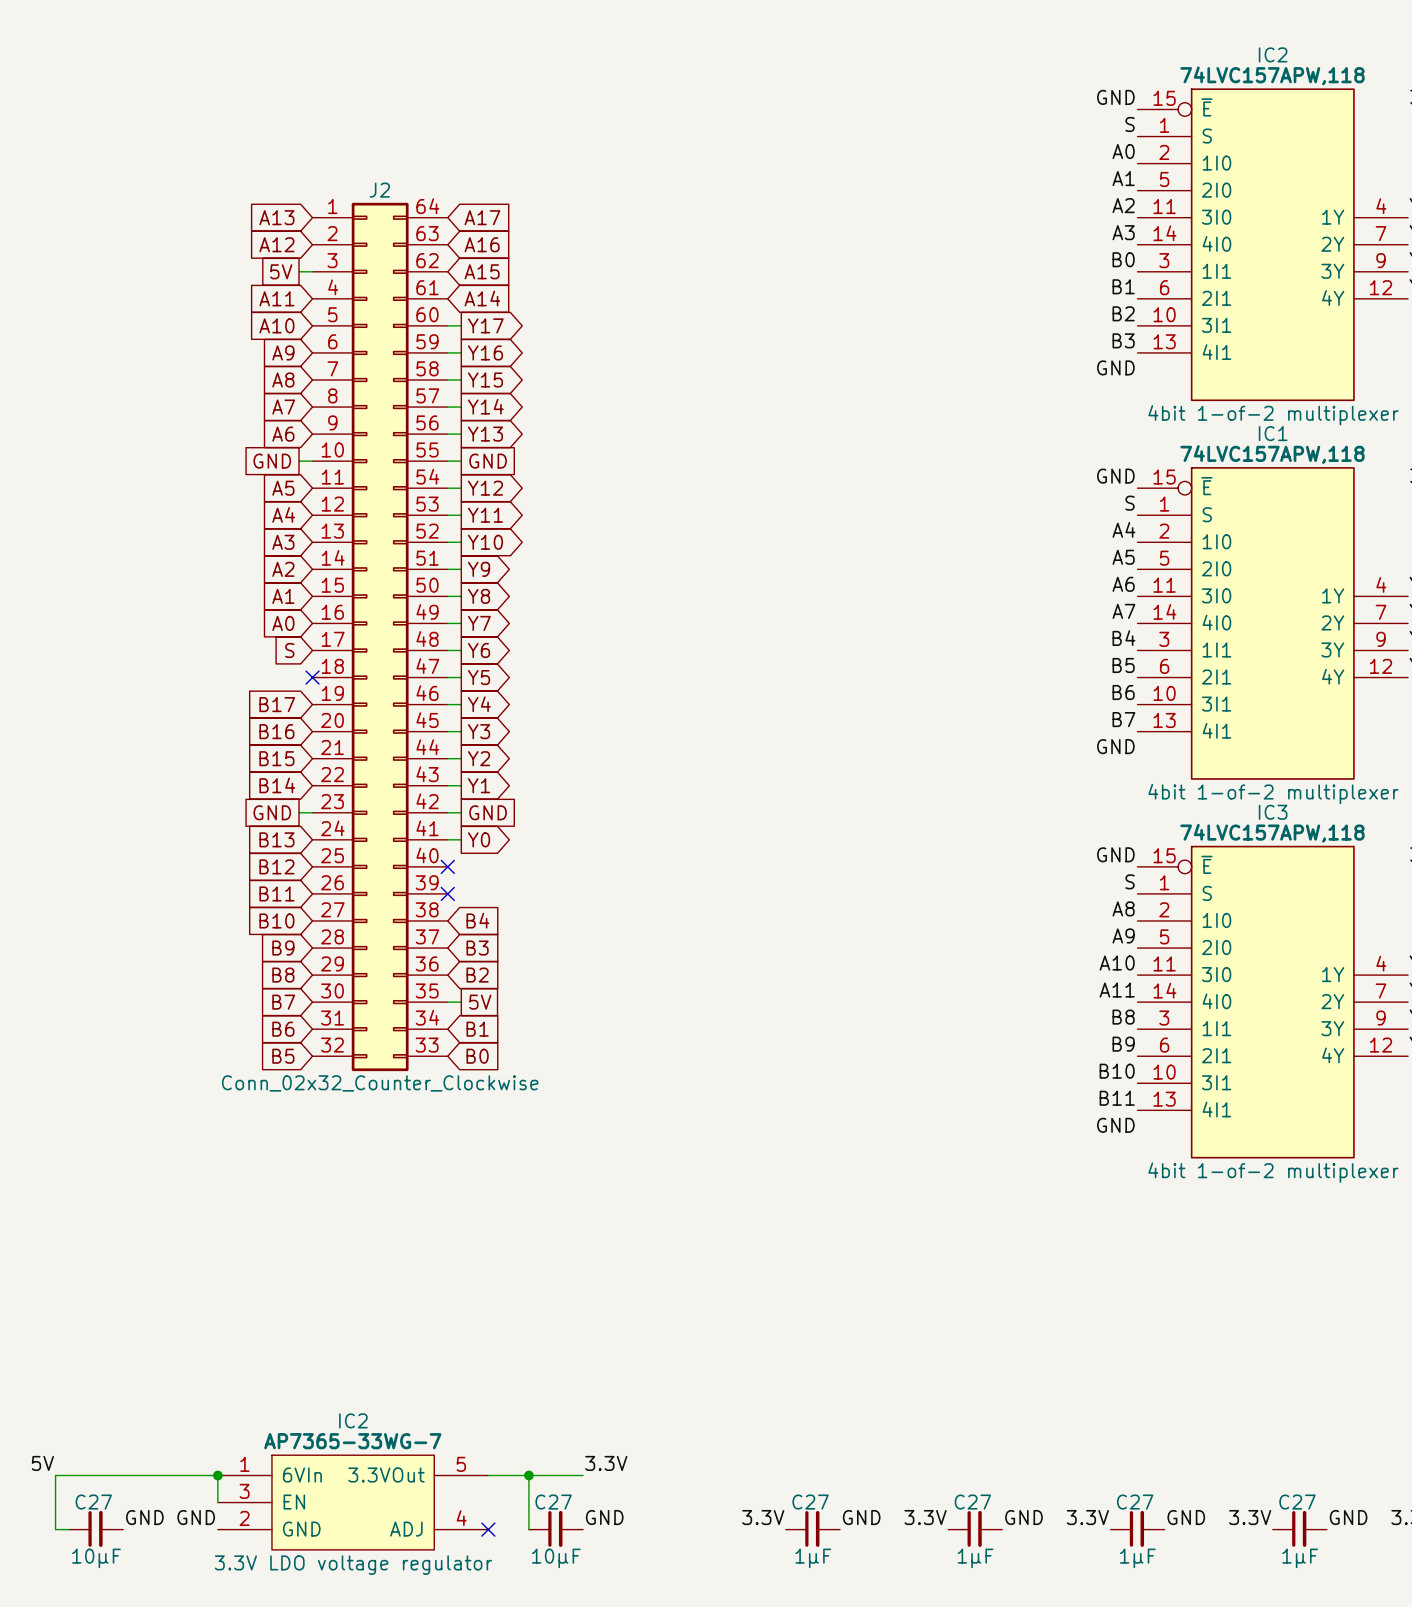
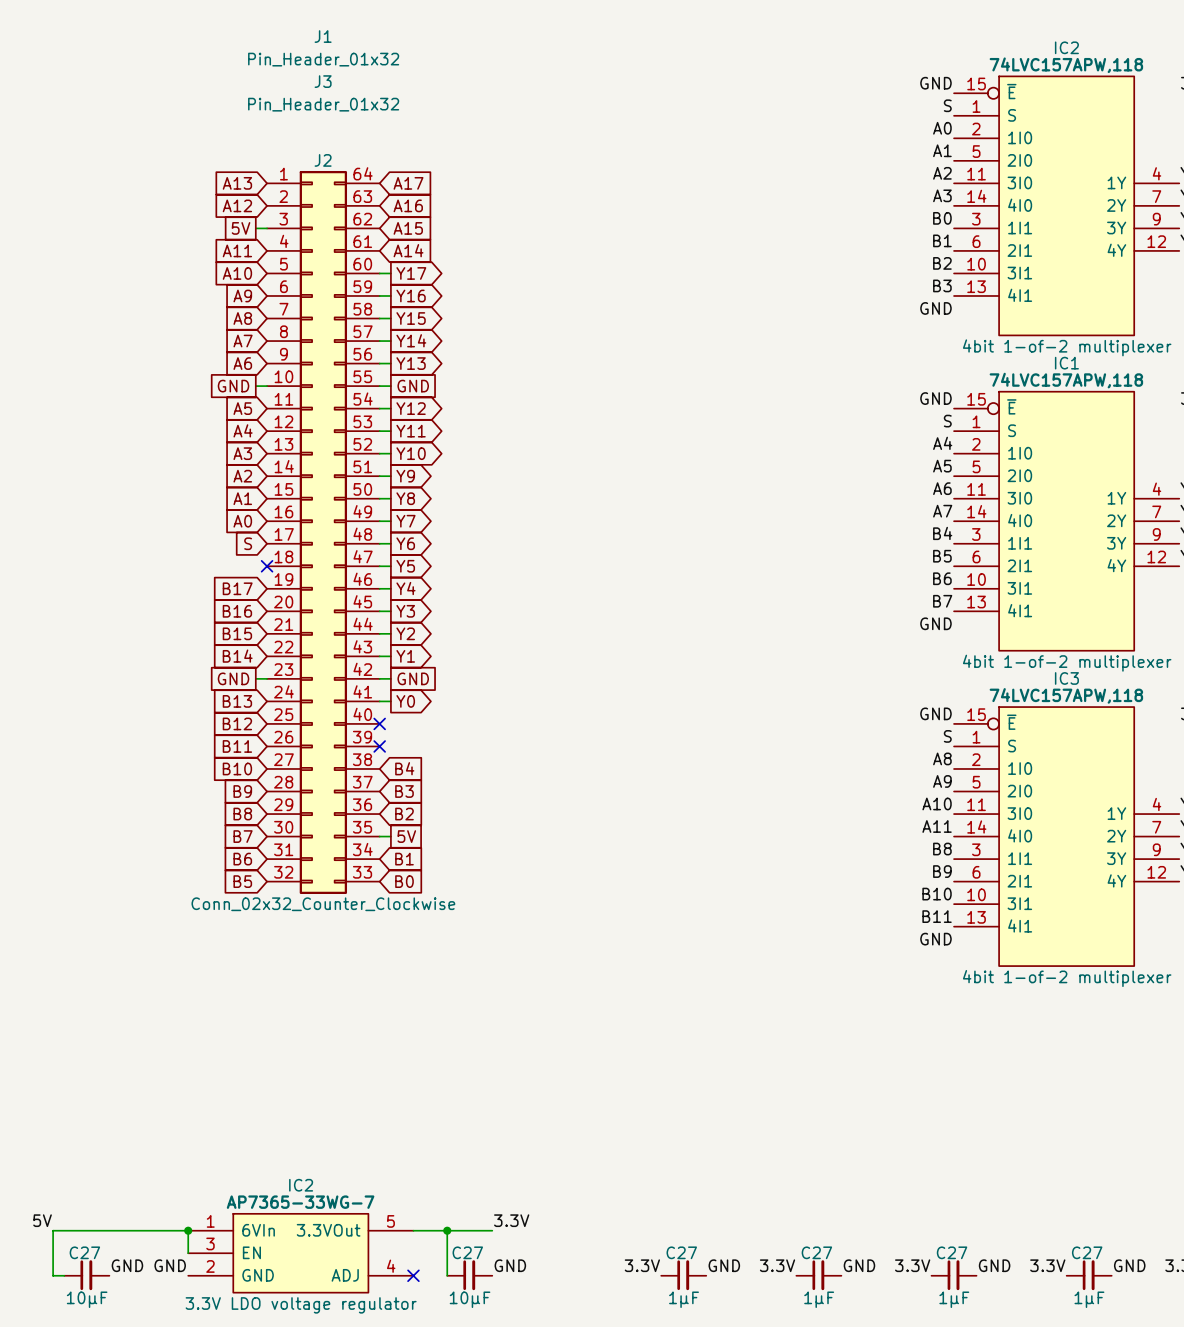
J1: none -> Pin_Header_01x32 (323, 48)
J3: none -> Pin_Header_01x32 (323, 93)

